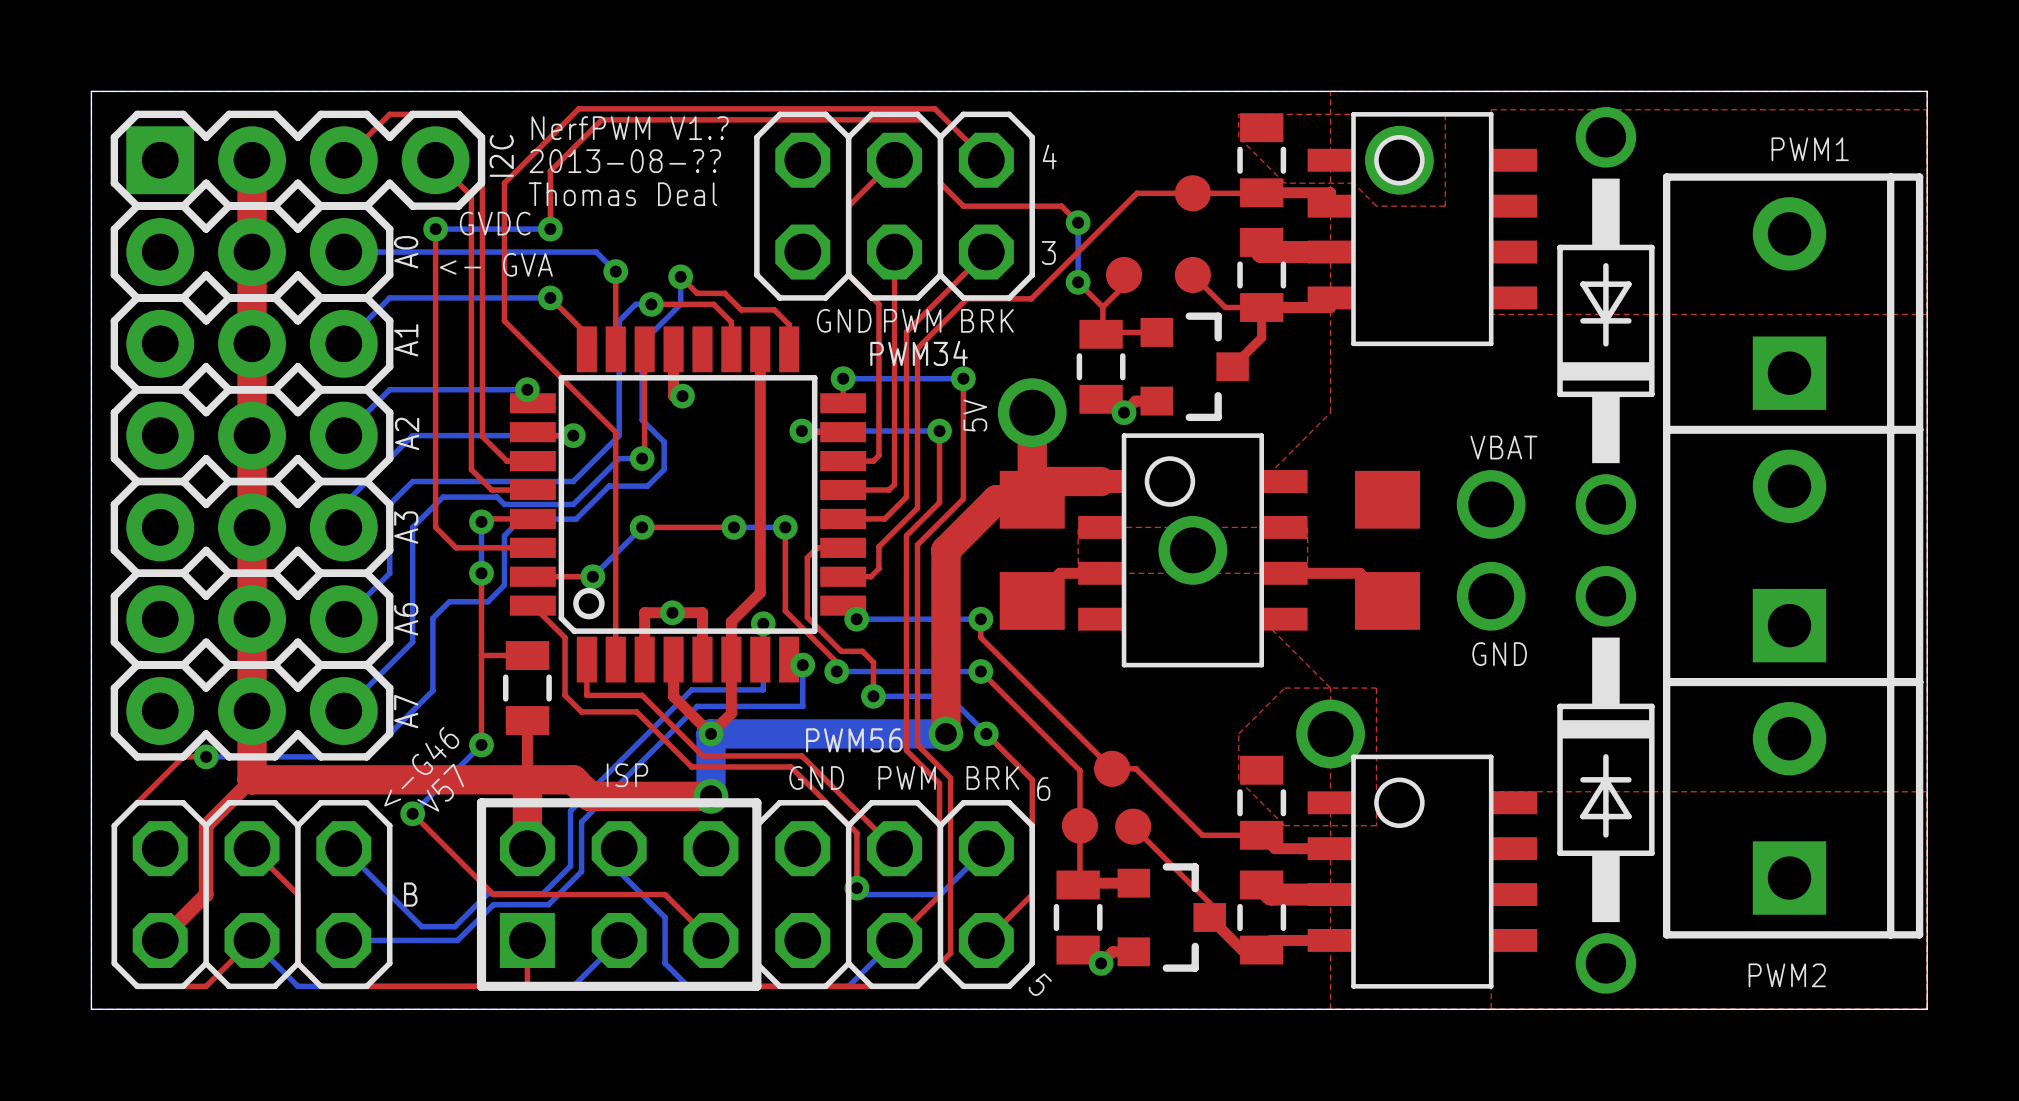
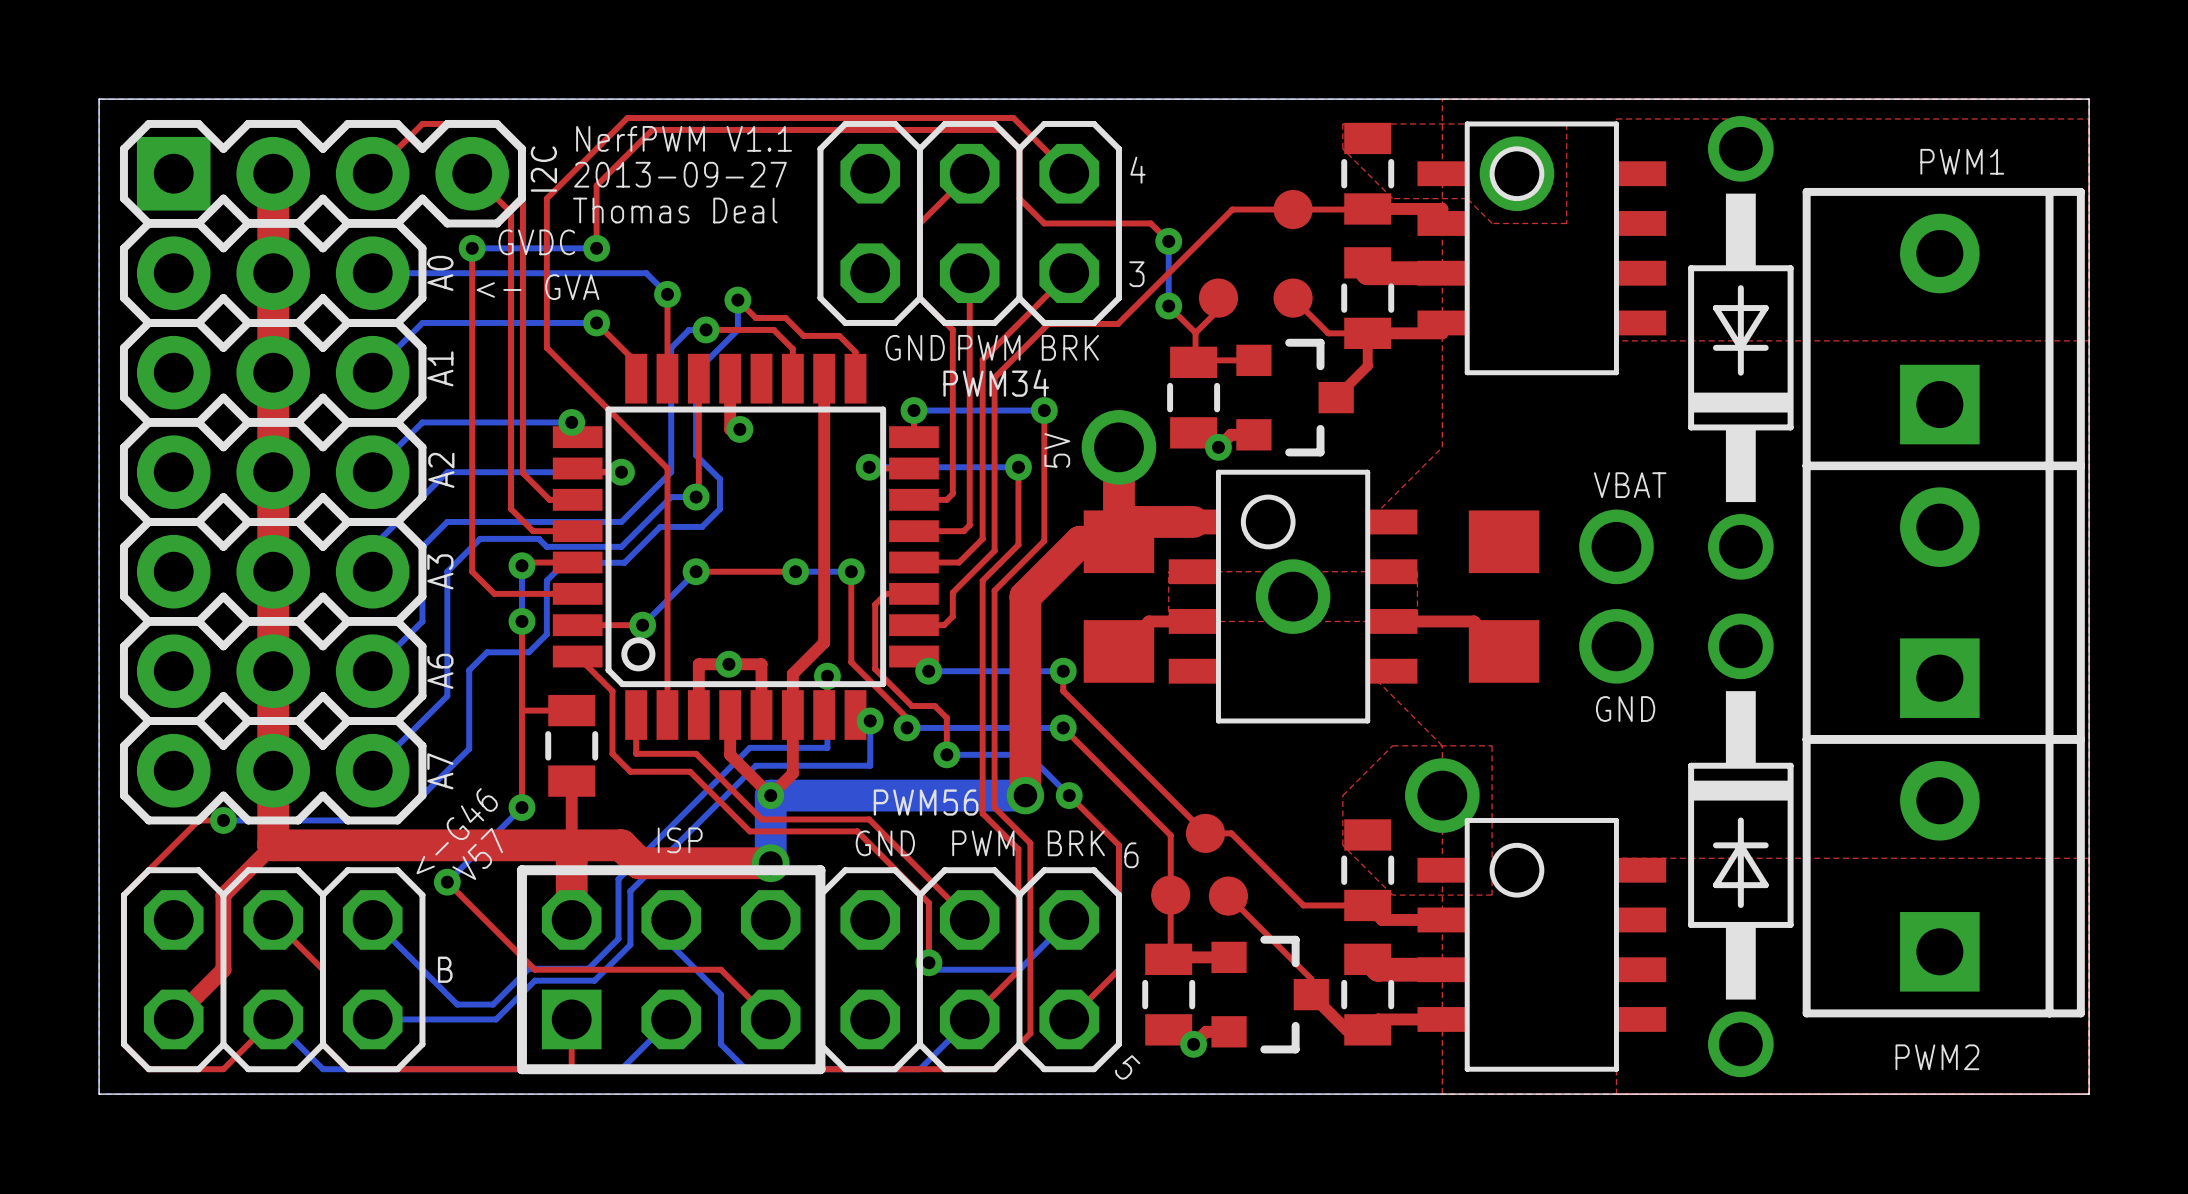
text: NerfPWM V1.? (630, 128) -> NerfPWM V1.1 (684, 138)
text: 2013-08-?? (625, 161) -> 2013-09-27 (680, 174)

